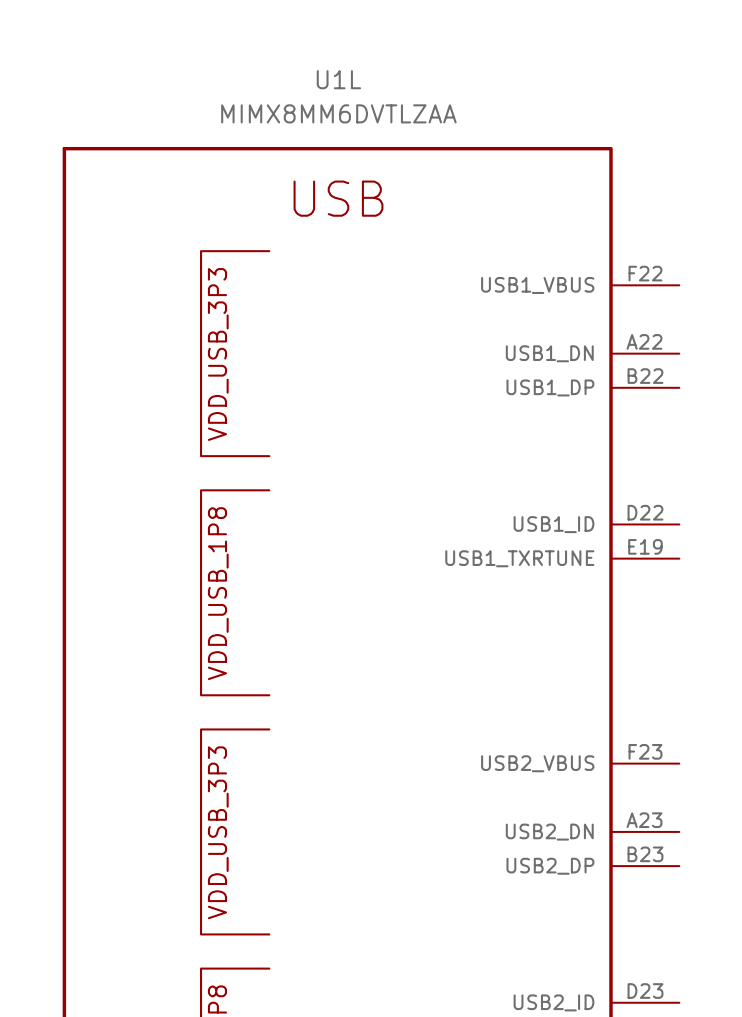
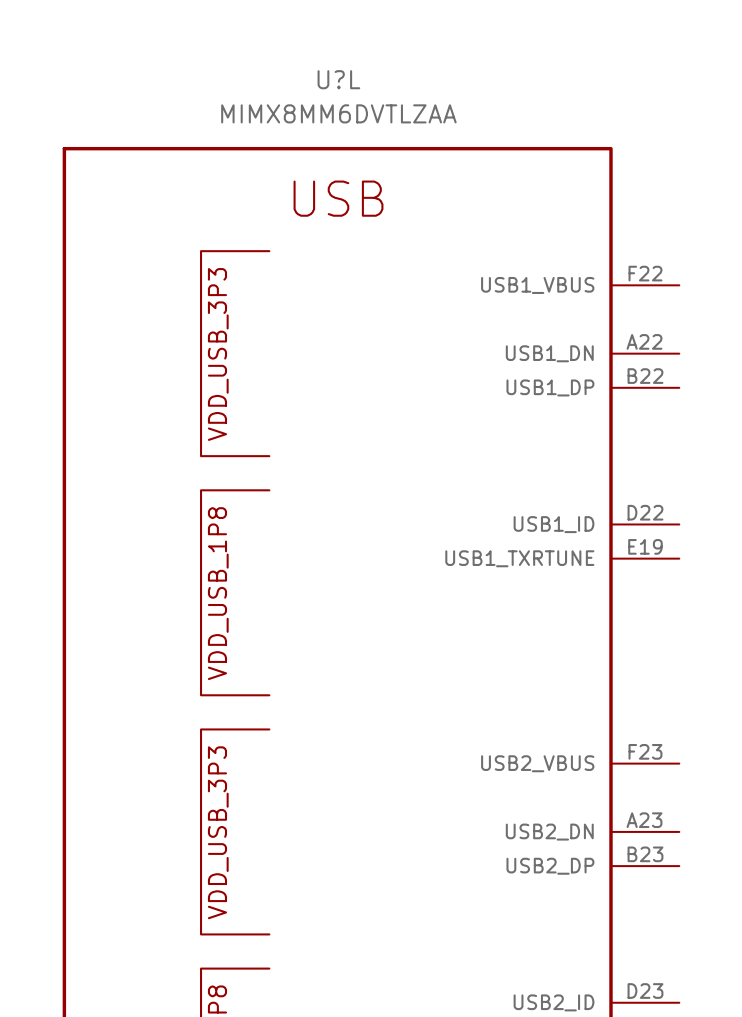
U1L name: U1L (338, 79) -> U?L (338, 79)

